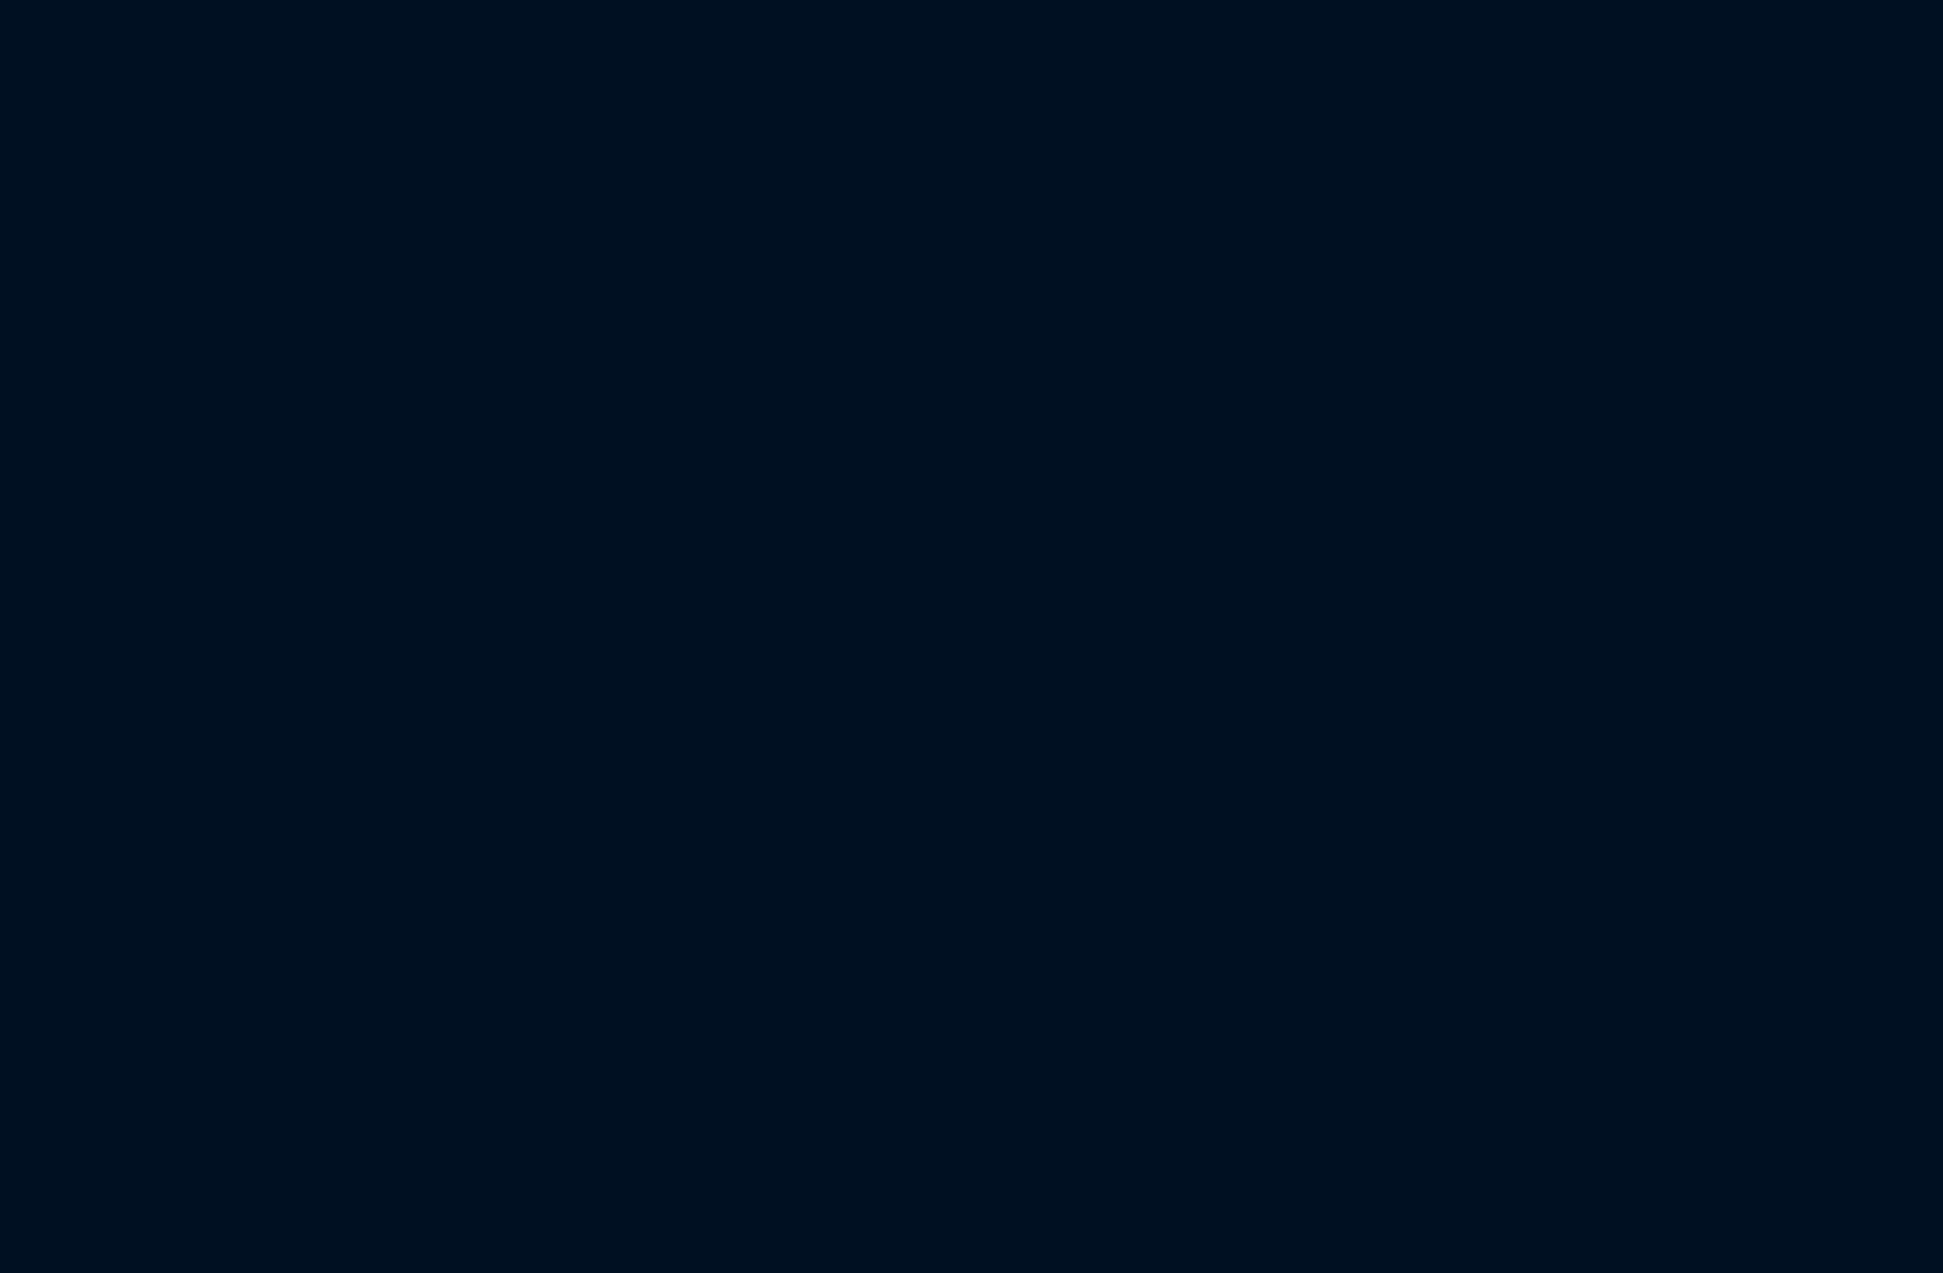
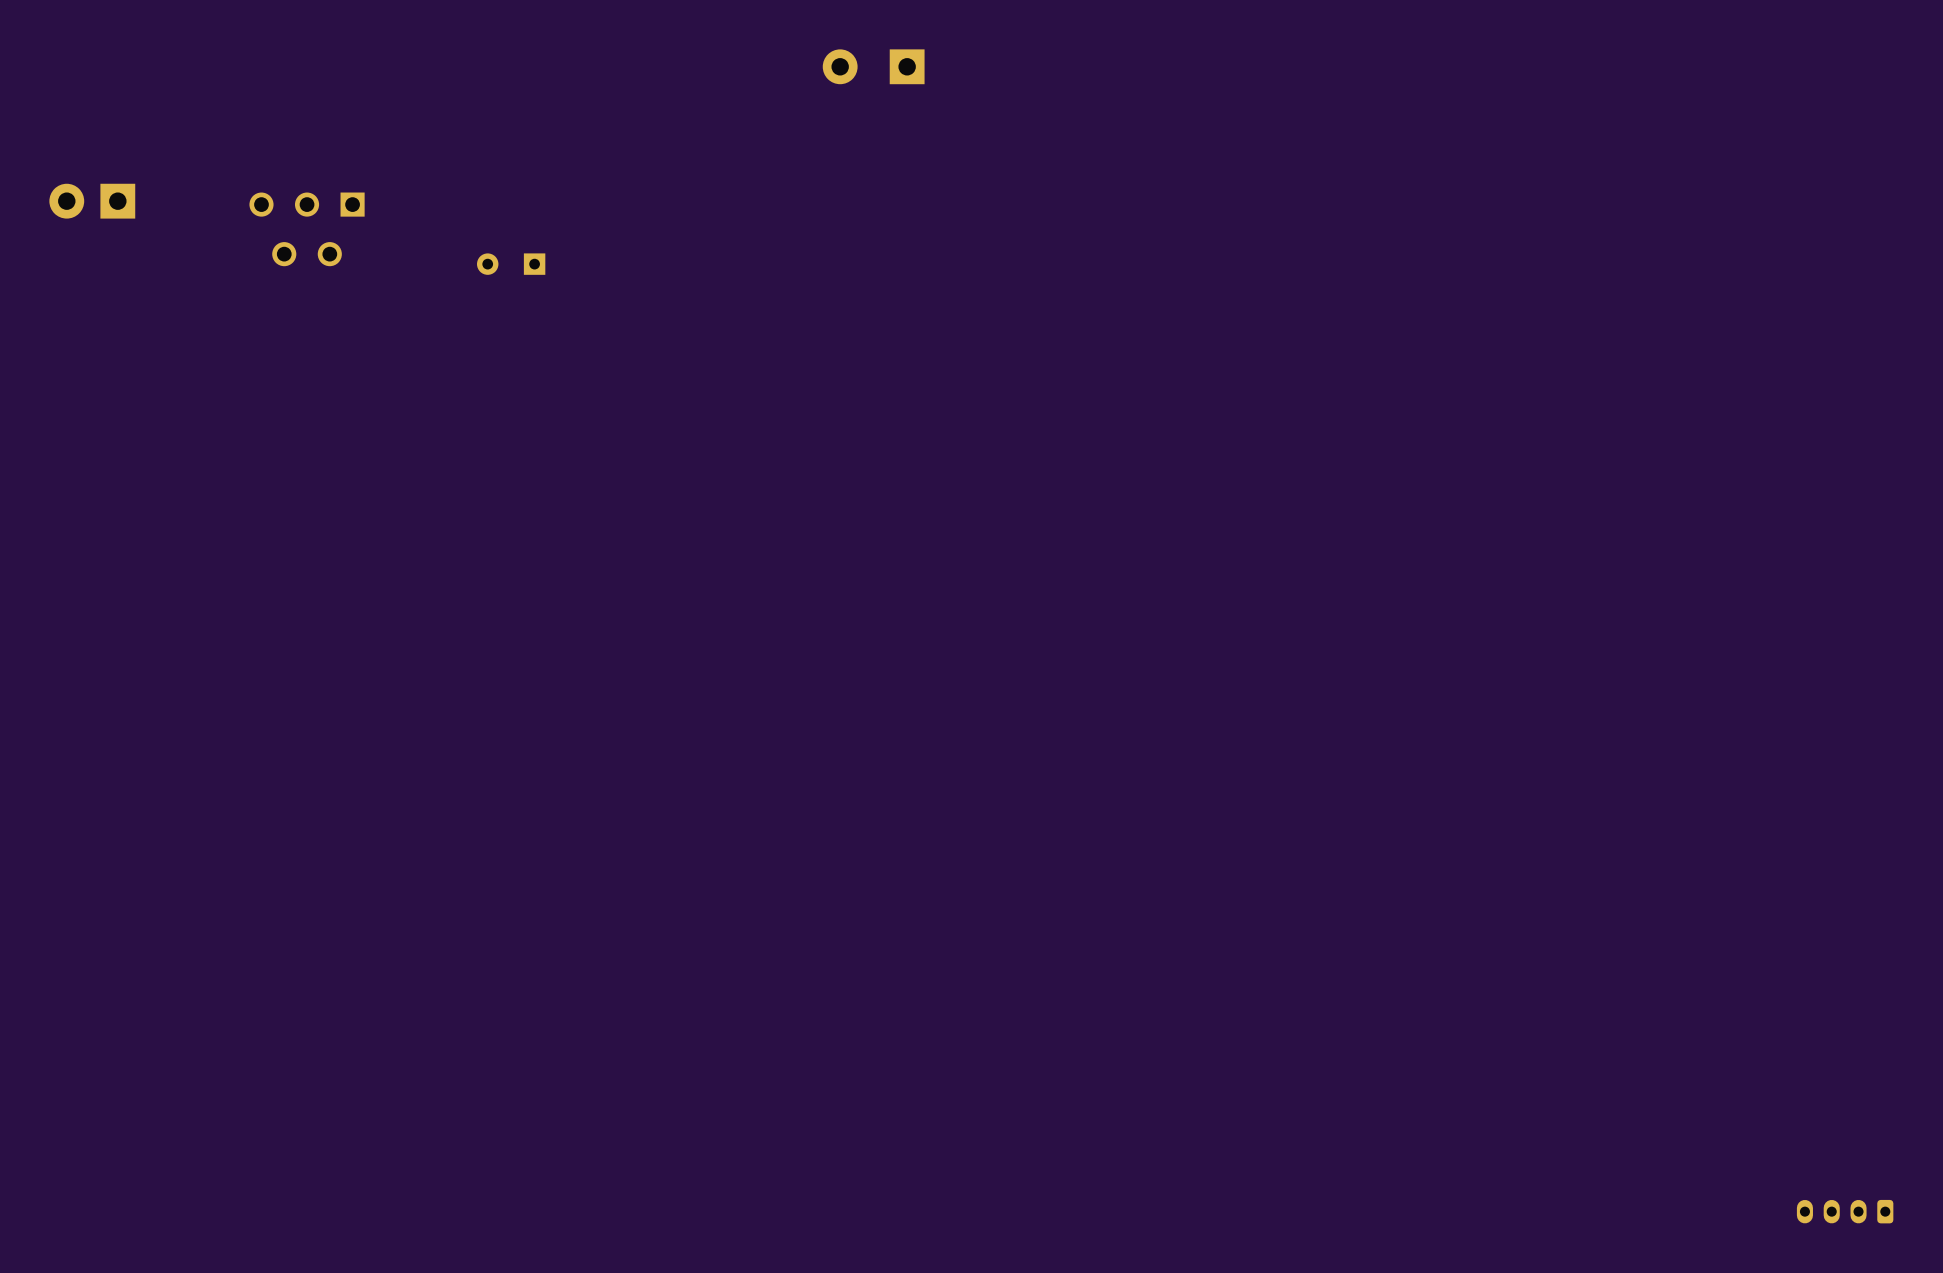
part: none -> (873, 66)
part: none -> (92, 201)
part: none -> (307, 229)
part: none -> (511, 264)
part: none -> (1845, 1211)

